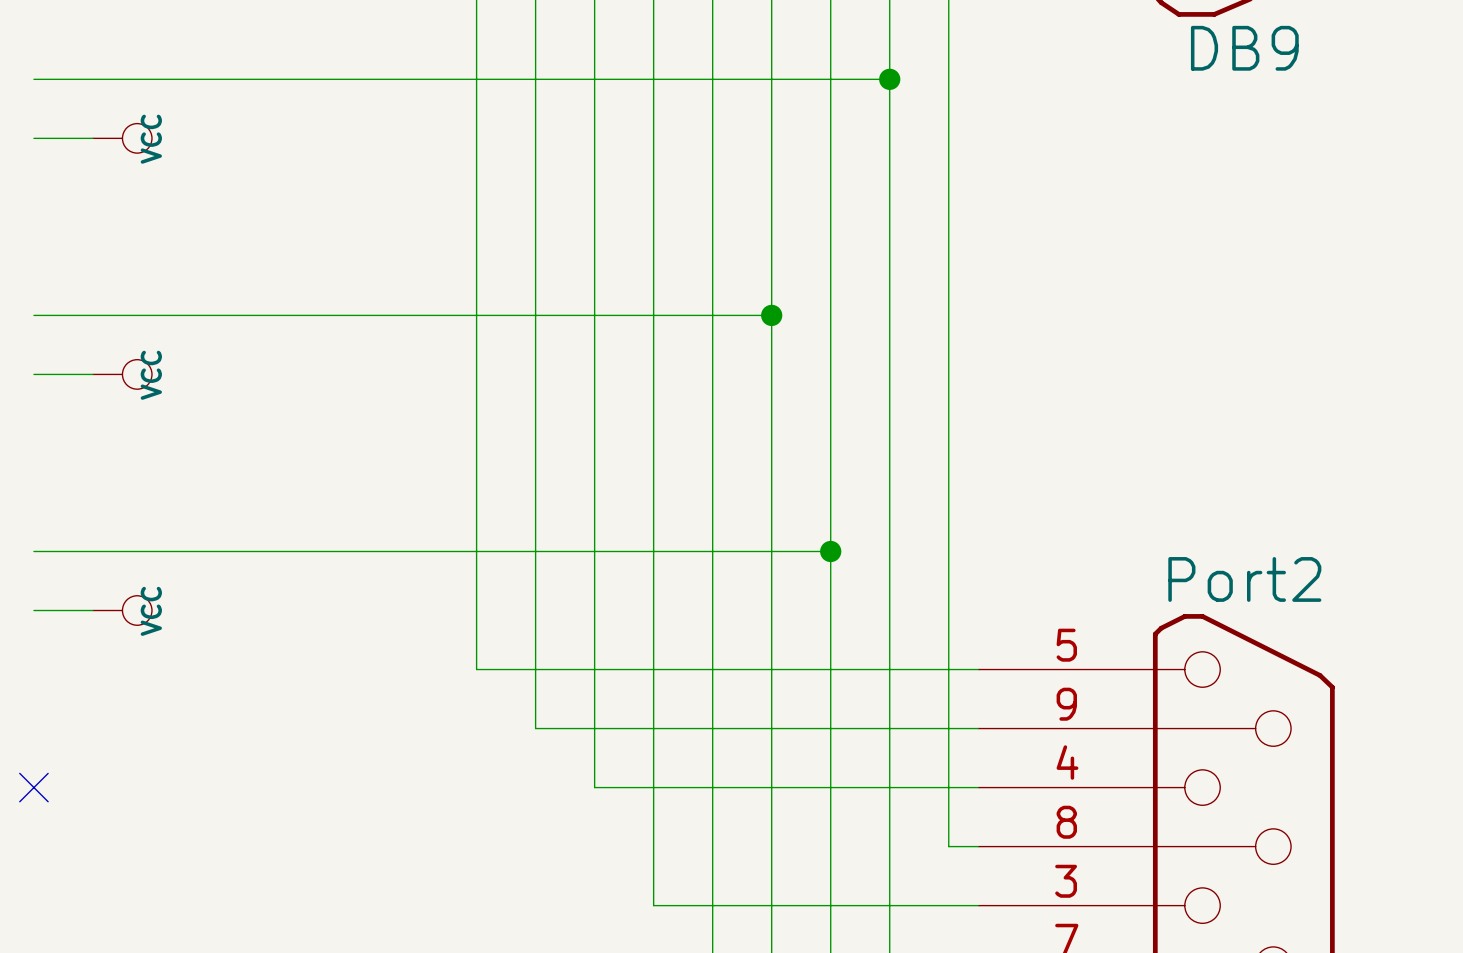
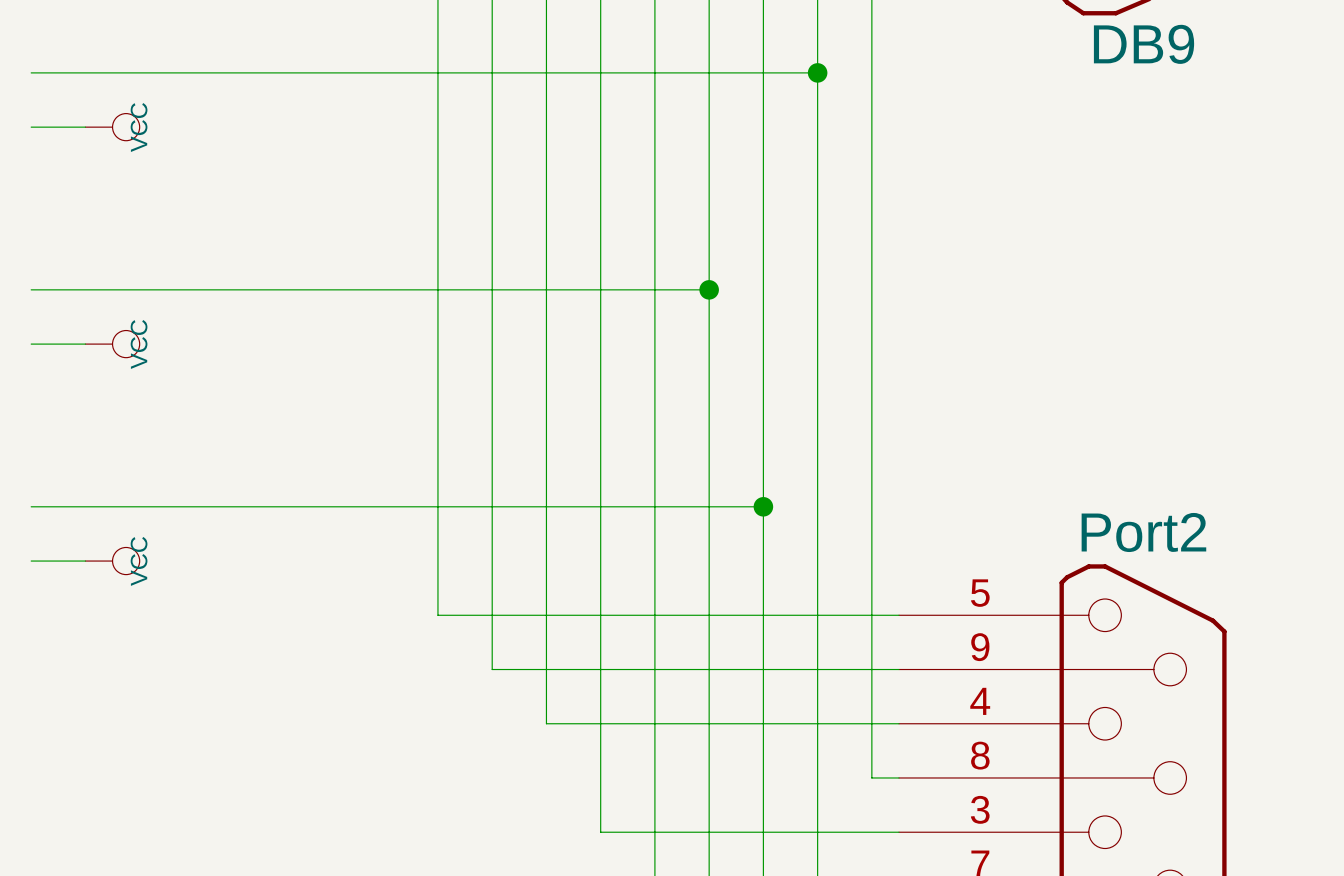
no-connect mark: (33, 787) -> none

